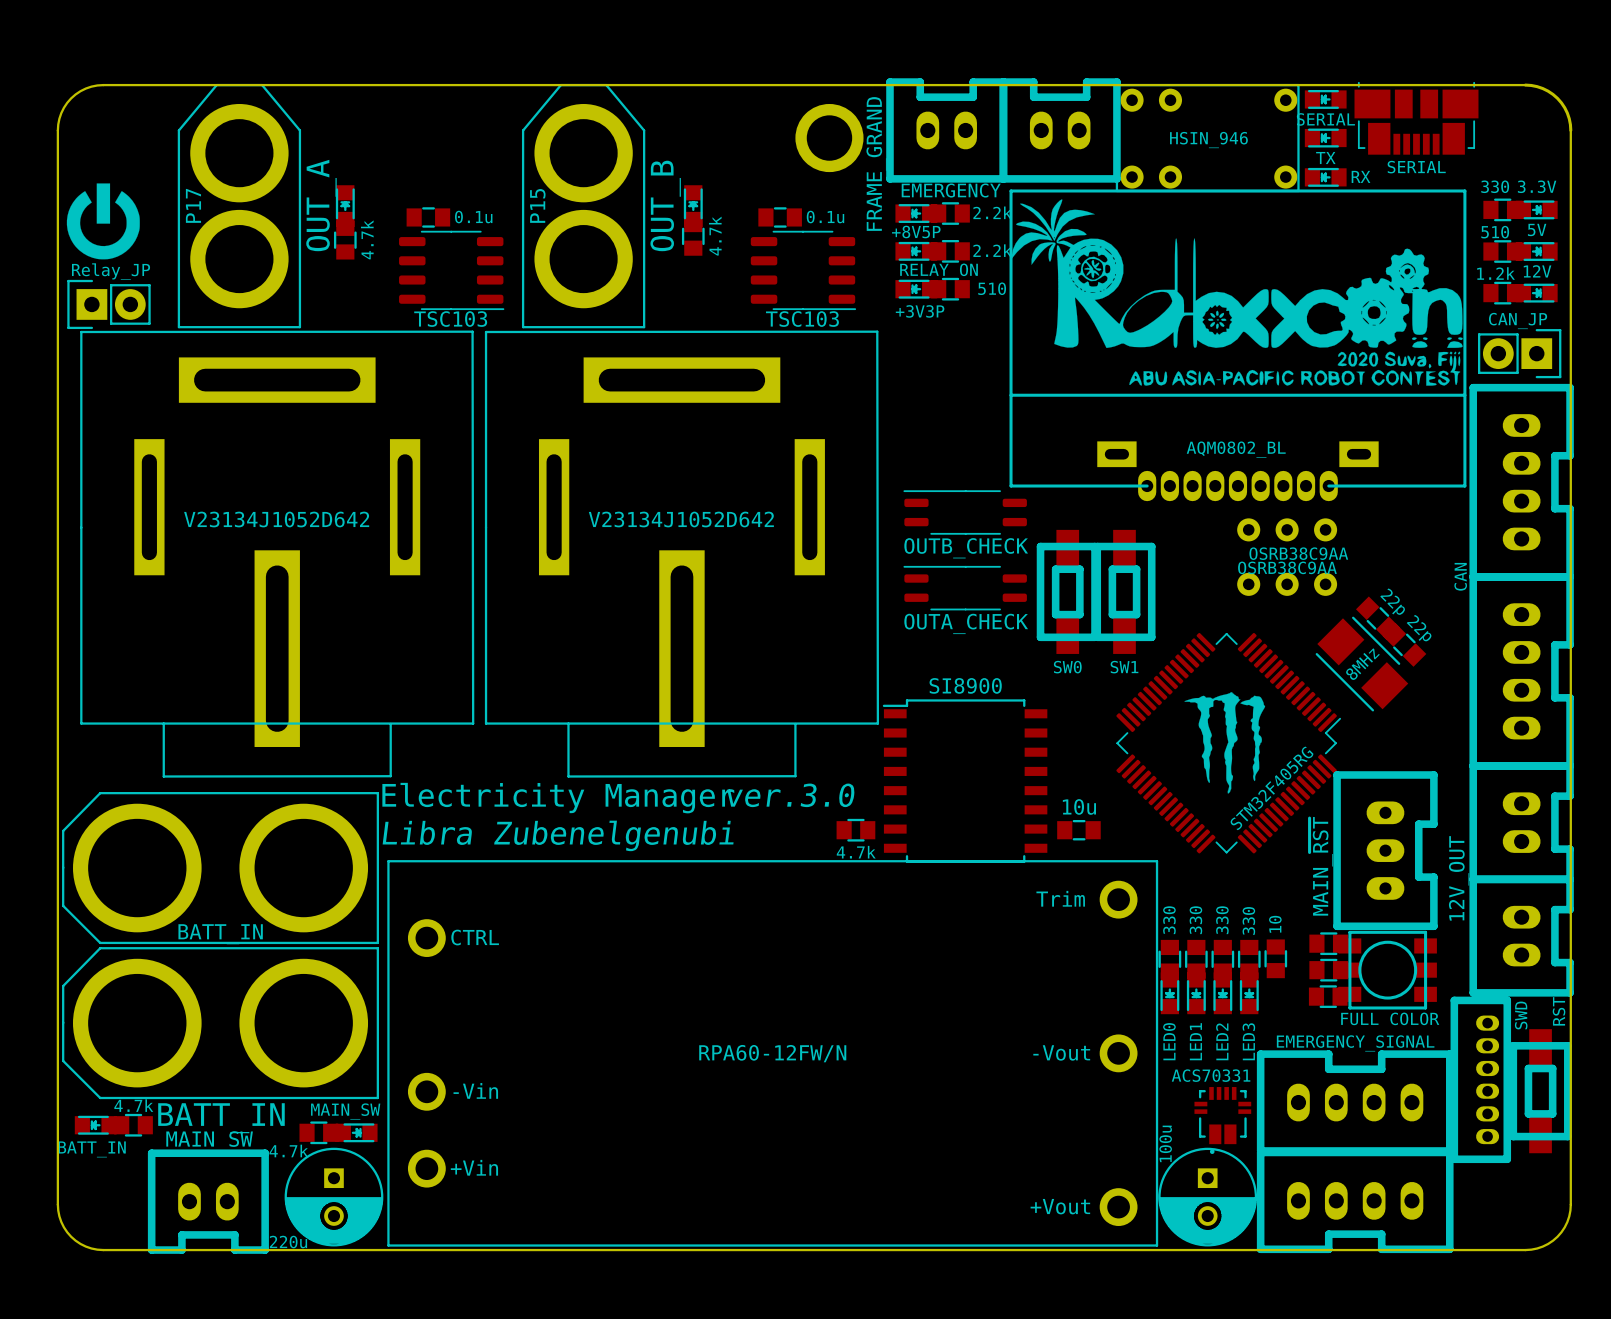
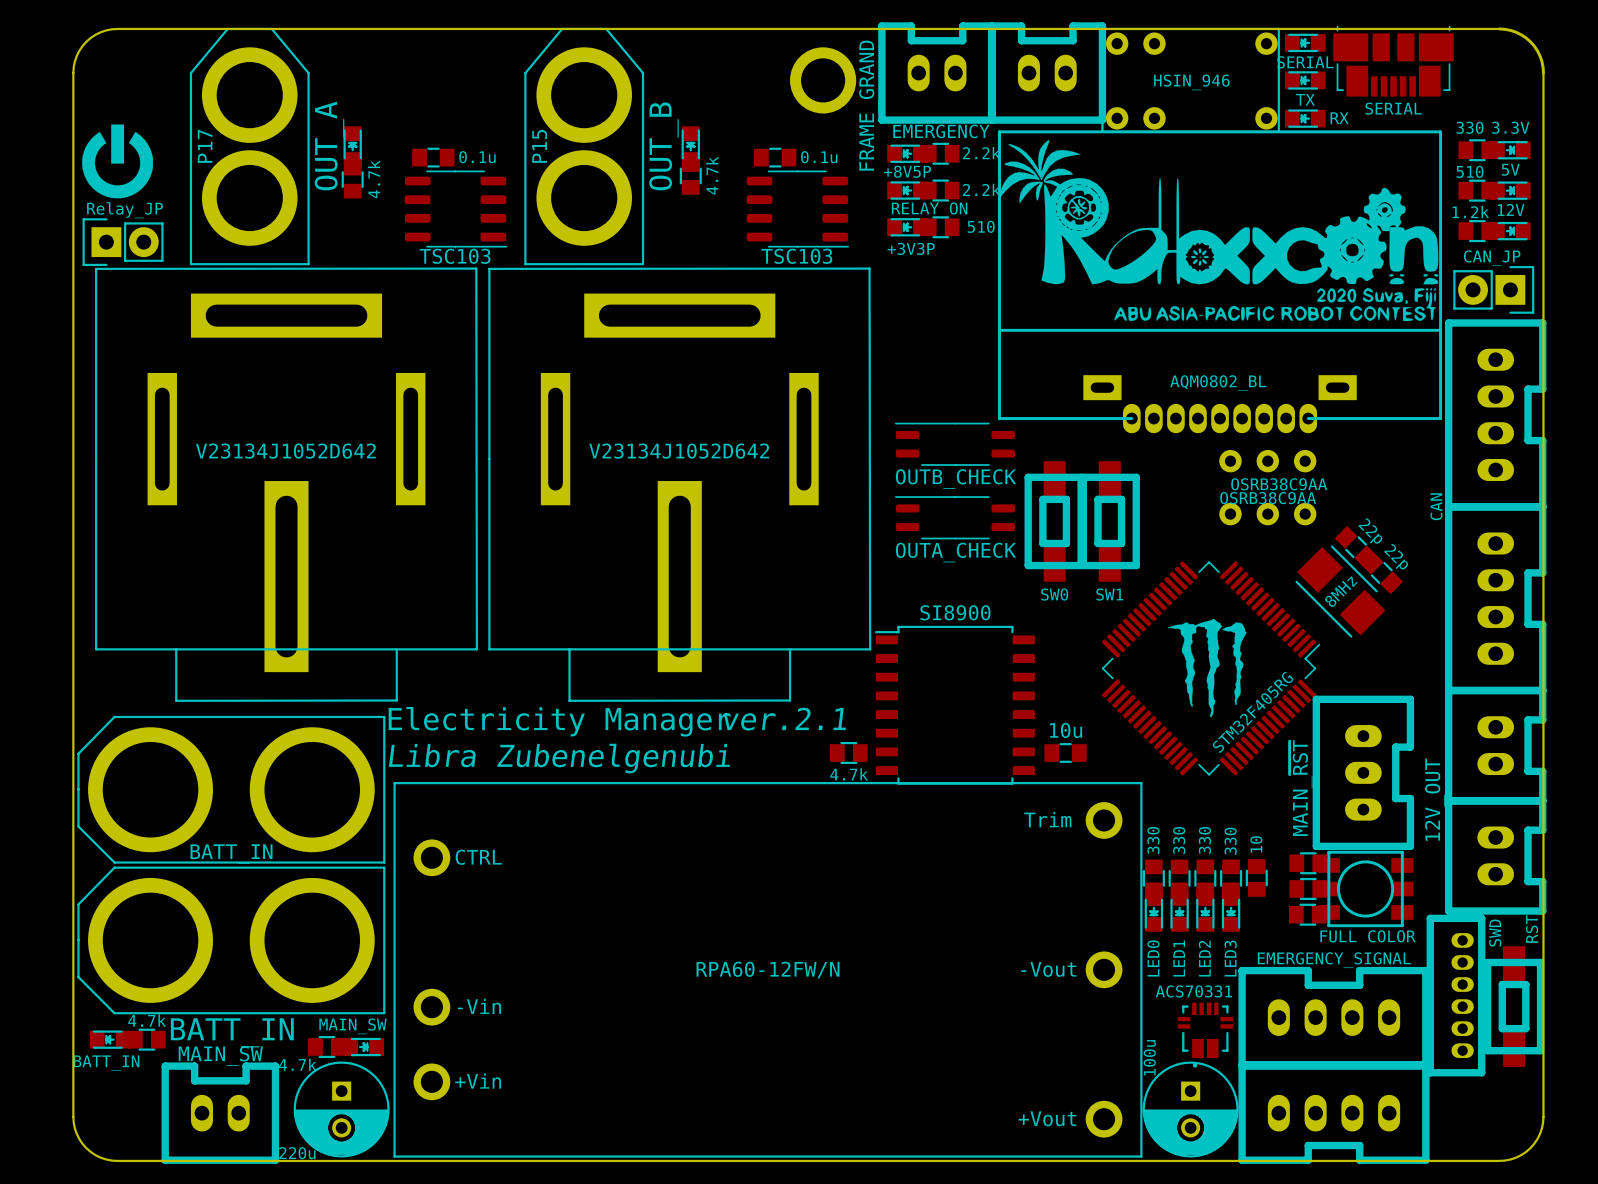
text: ver.3.0 (791, 795) -> ver.2.1 (784, 719)
part rotation: 0° (208, 1201) -> 180° (220, 1113)

